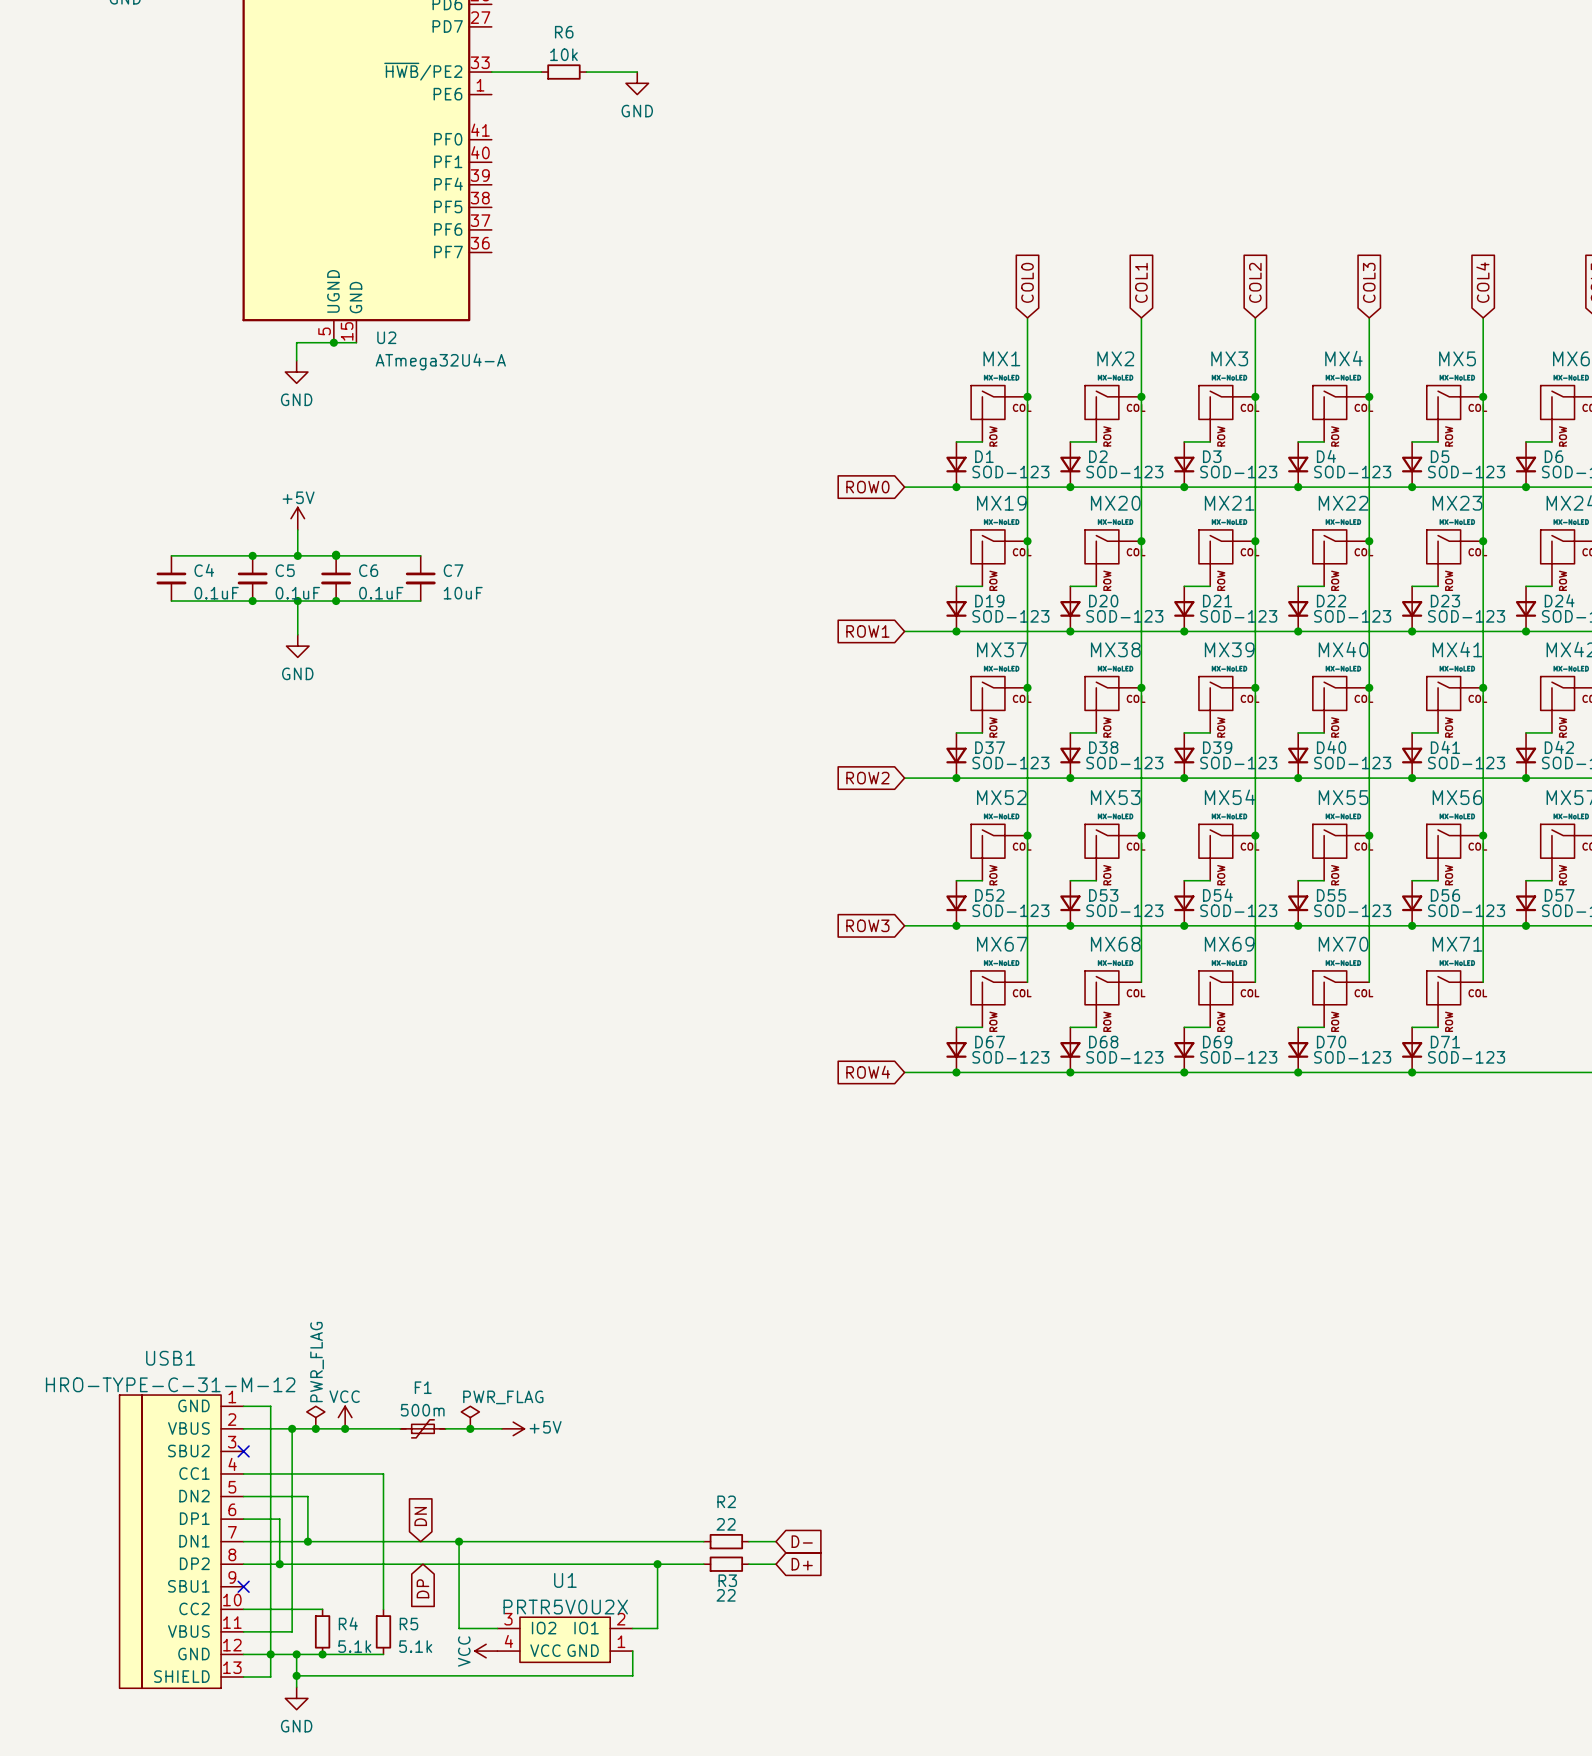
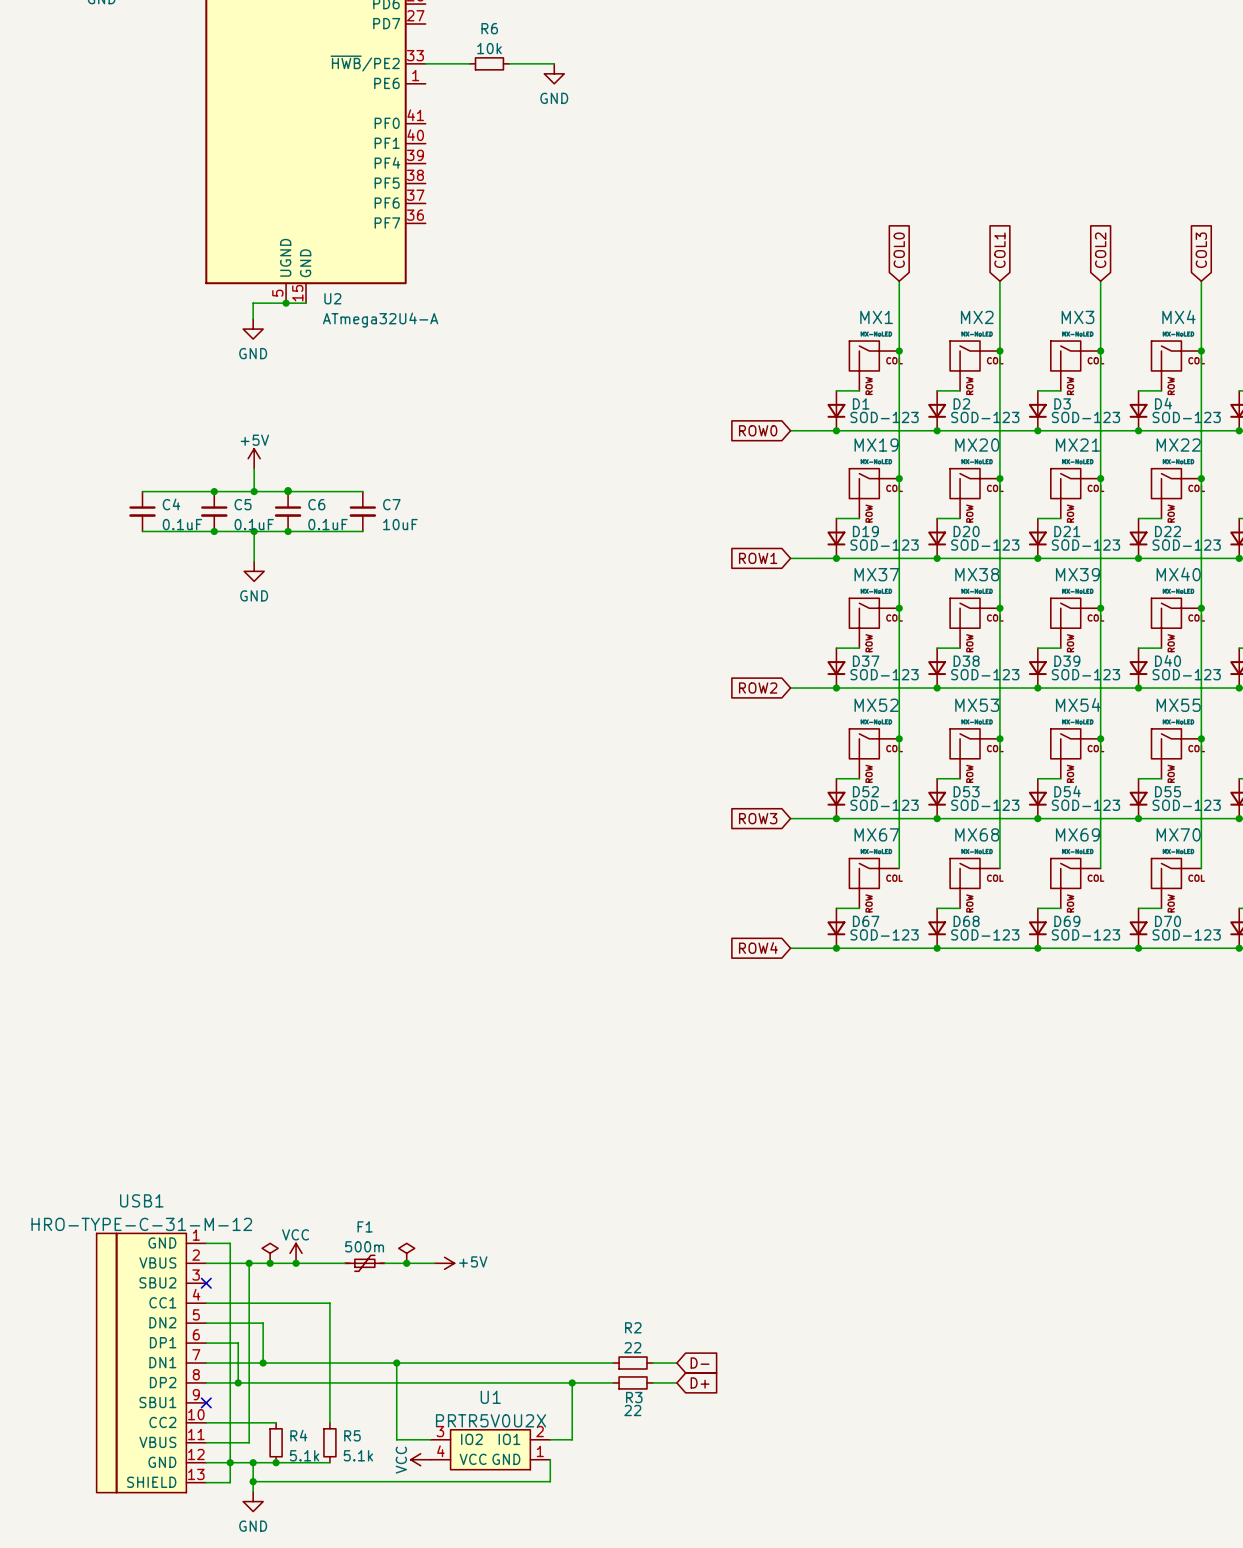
power symbol text: PWR_FLAG (317, 1362) -> none
power symbol text: PWR_FLAG (503, 1397) -> none
global label: DN (420, 1516) -> none
global label: DP (422, 1588) -> none

